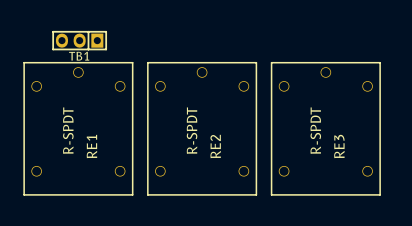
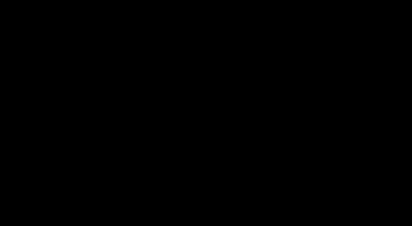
TB1: (79, 40) -> none
RE1: R-SPDT (78, 128) -> none
RE2: R-SPDT (202, 128) -> none
RE3: R-SPDT (325, 128) -> none

